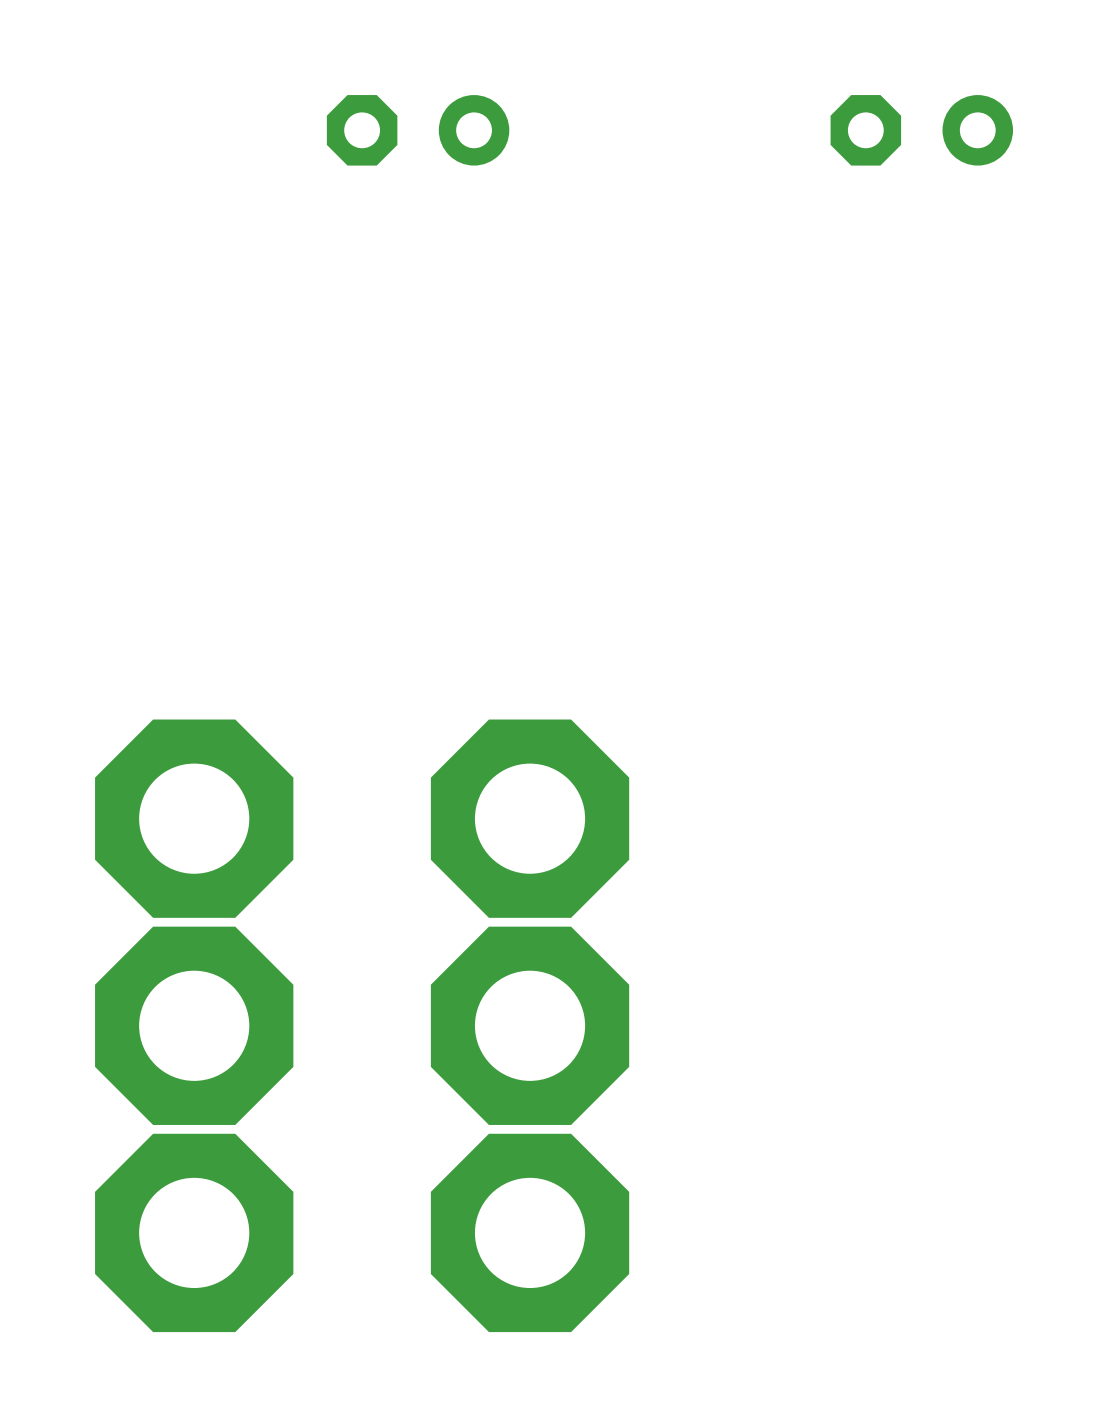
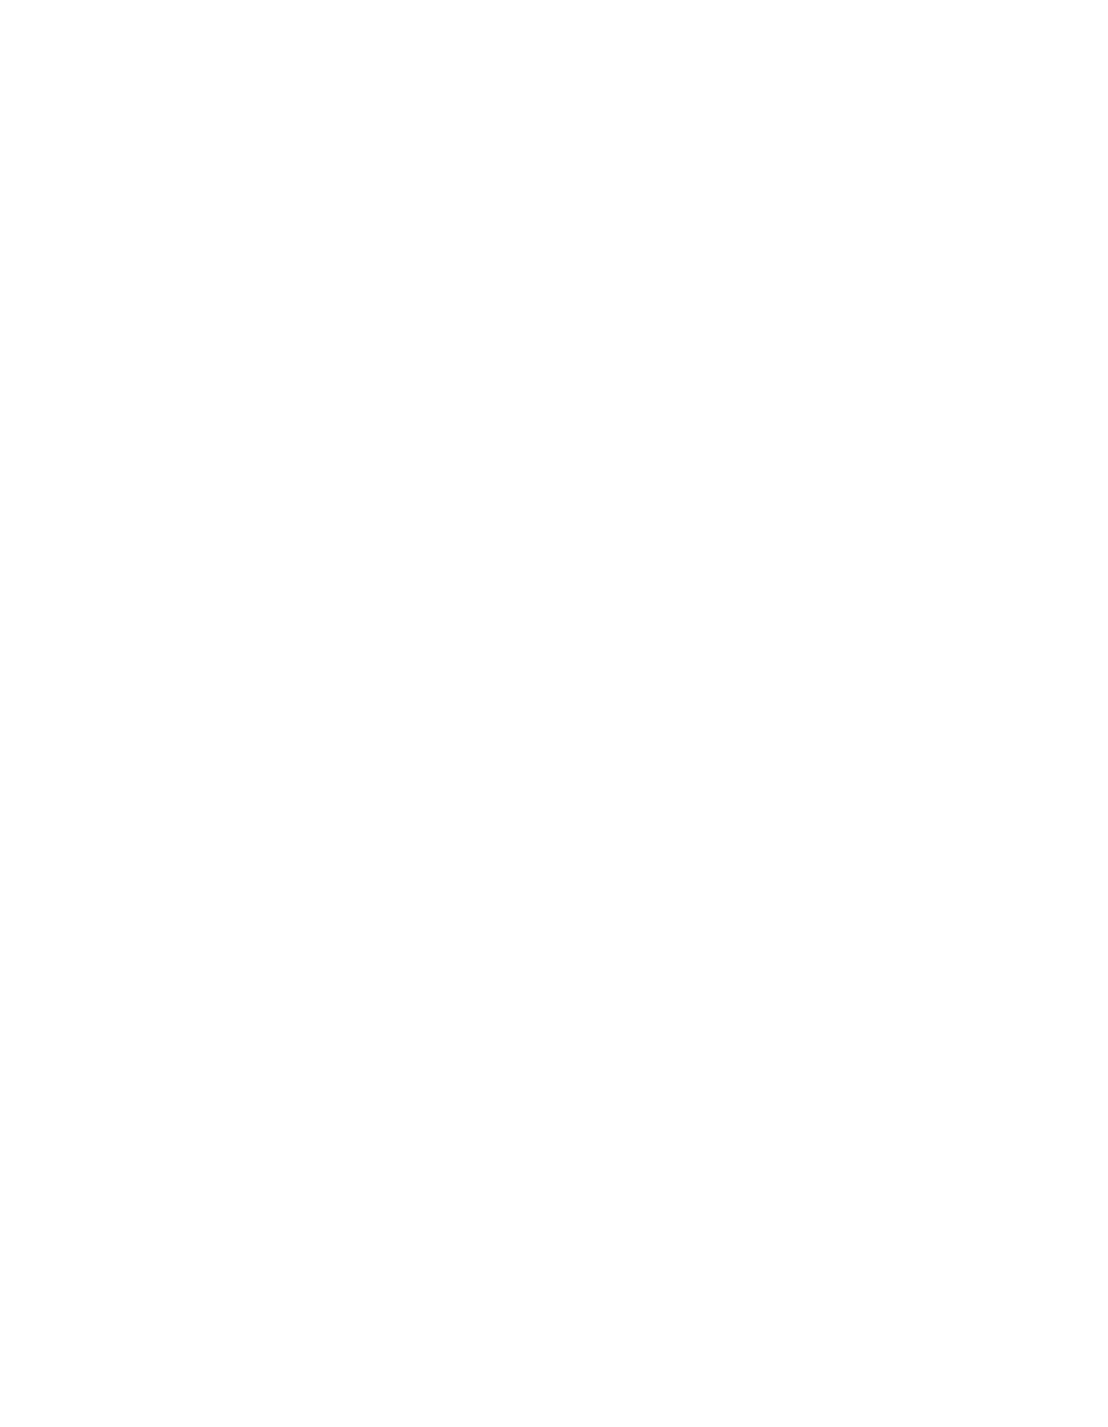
part: (418, 130) -> none
part: (921, 130) -> none
part: (194, 1025) -> none
part: (530, 1025) -> none

